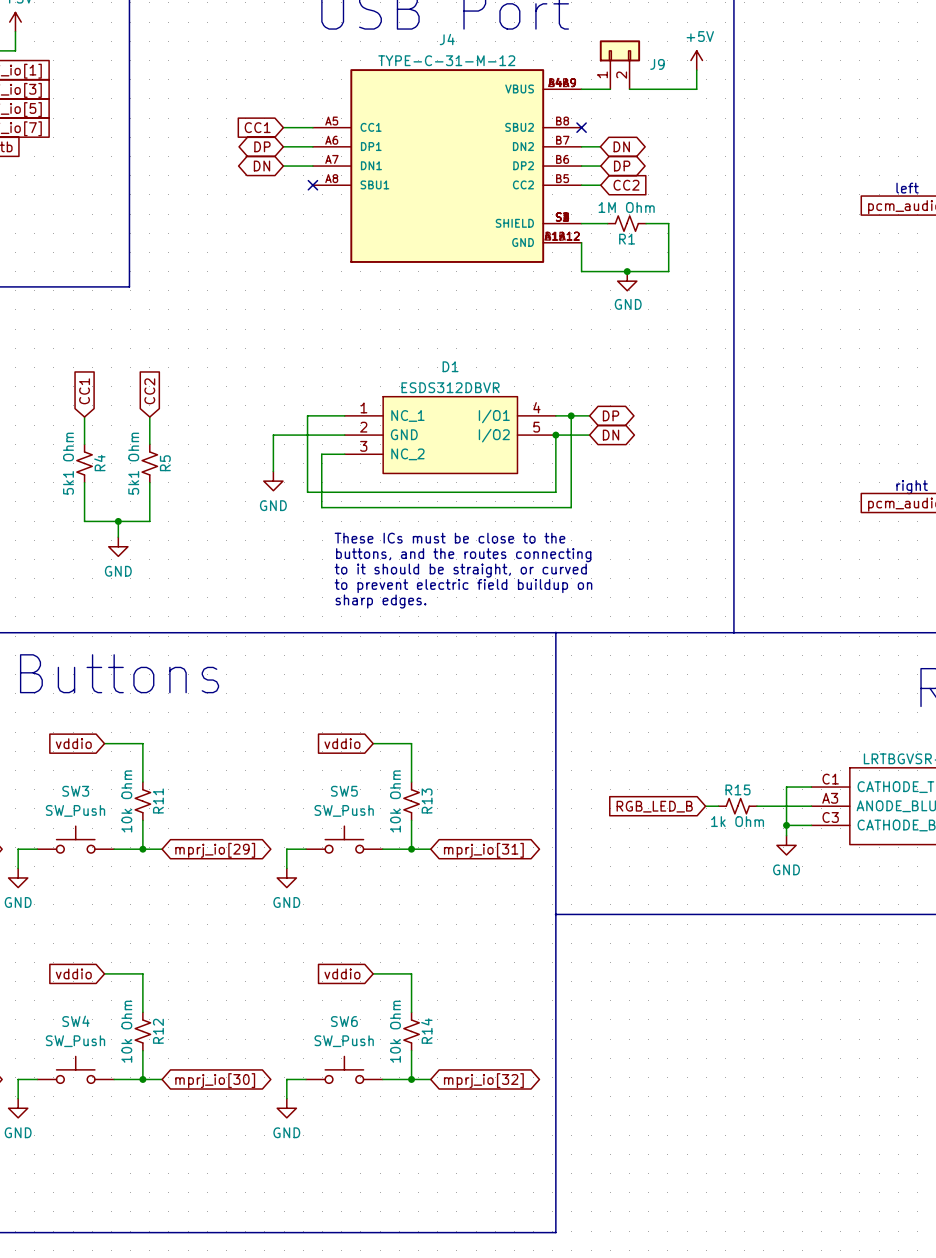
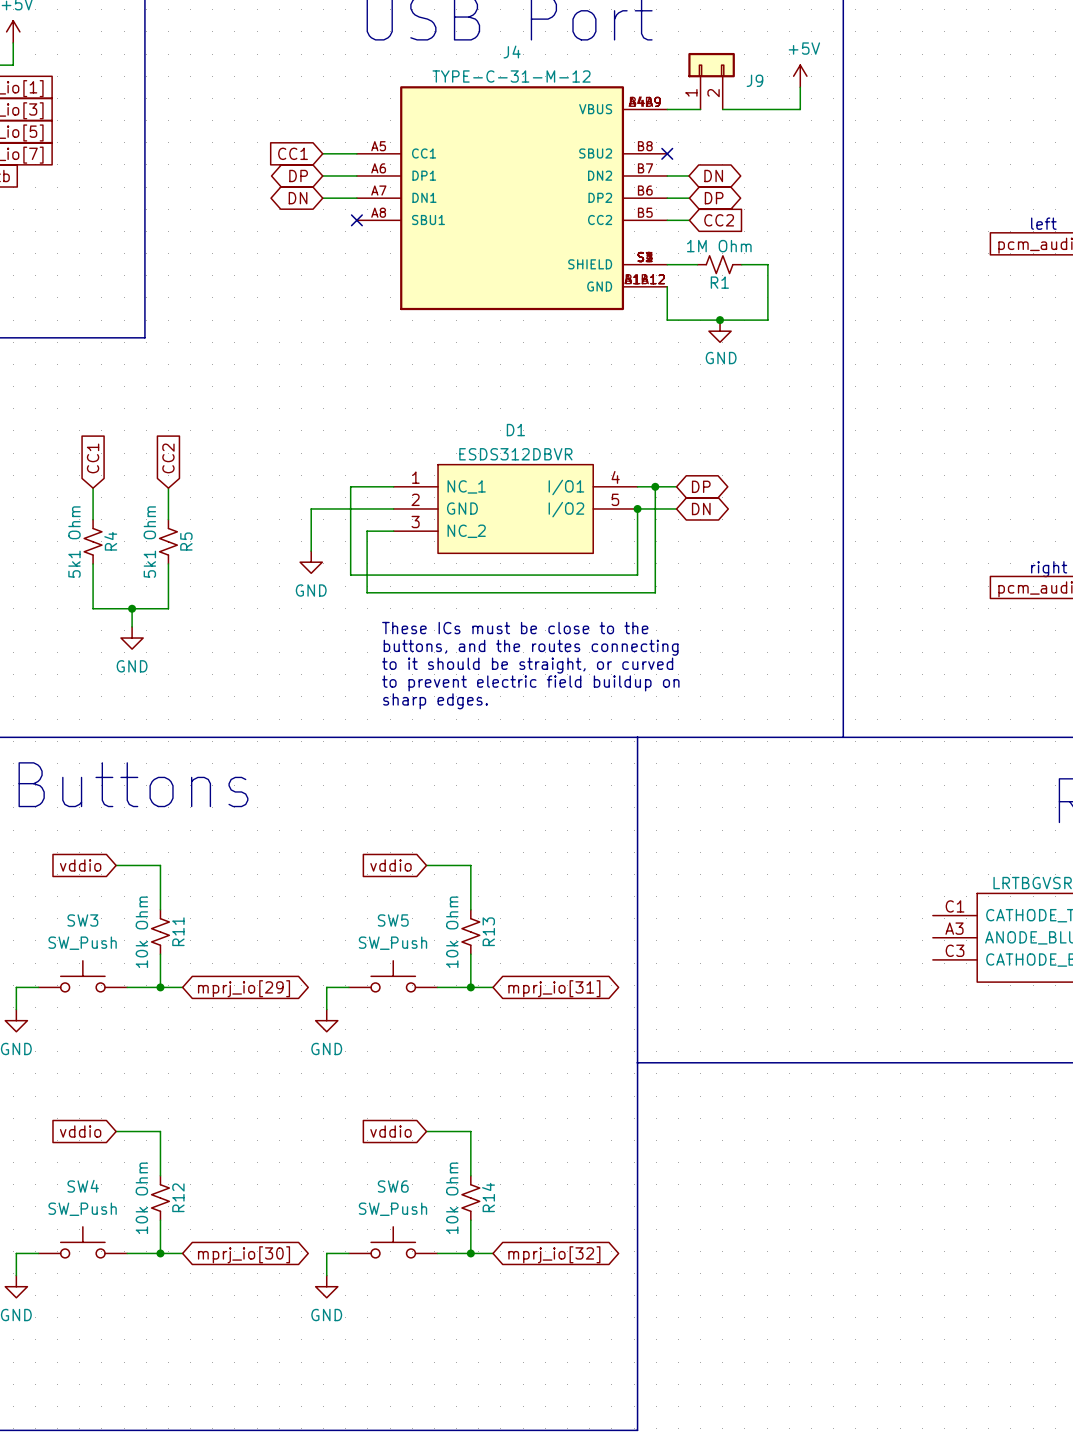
wire: (811, 787) (786, 787) (786, 835) -> none
global label: RGB_LED_B (654, 806) -> none
wire: (705, 806) (718, 806) -> none
R15: 1k Ohm (737, 806) -> none
wire: (756, 806) (811, 806) -> none
wire: (786, 825) (811, 825) -> none
junction: (786, 825) -> none
power symbol: GND (786, 845) -> none

